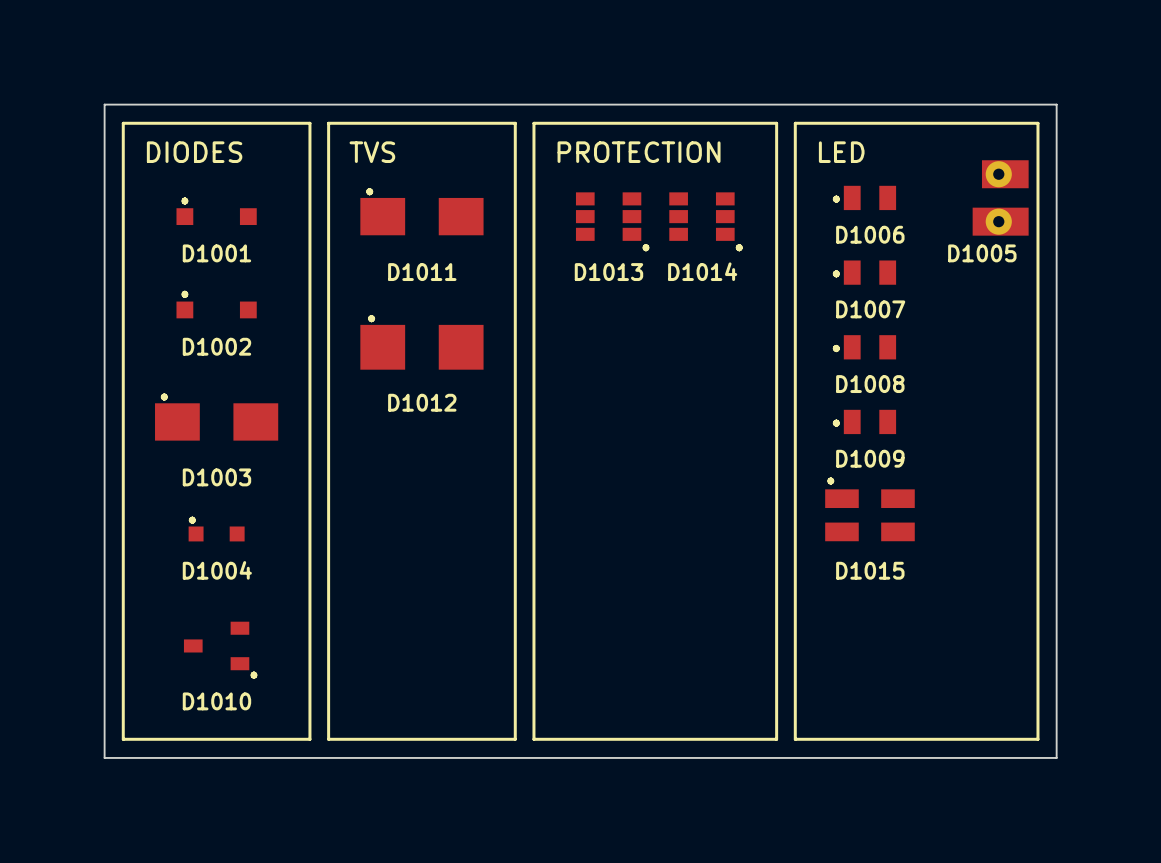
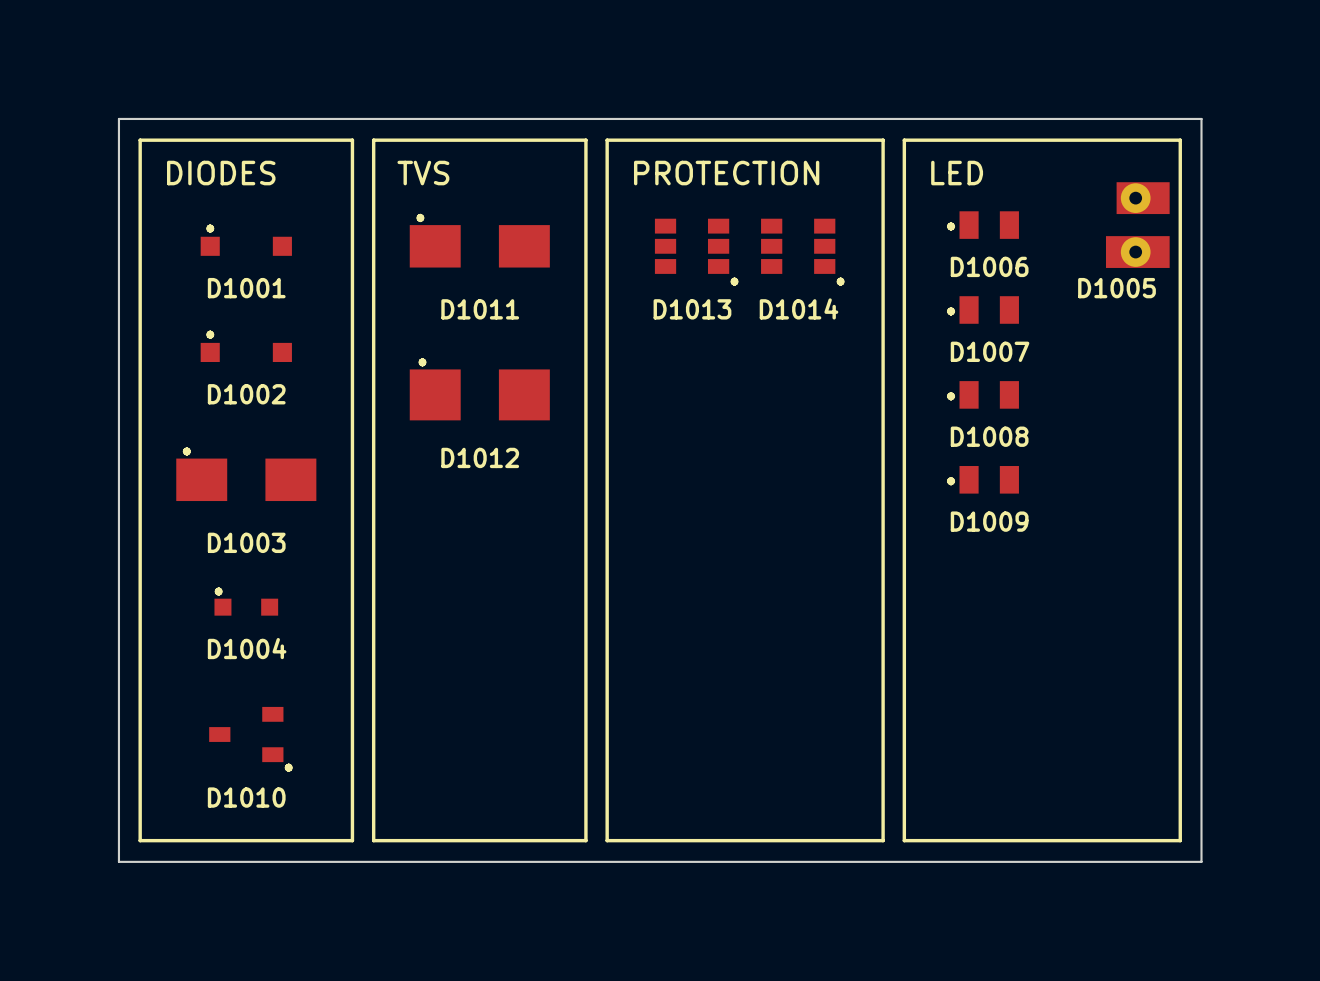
D1015: (869, 515) -> none

